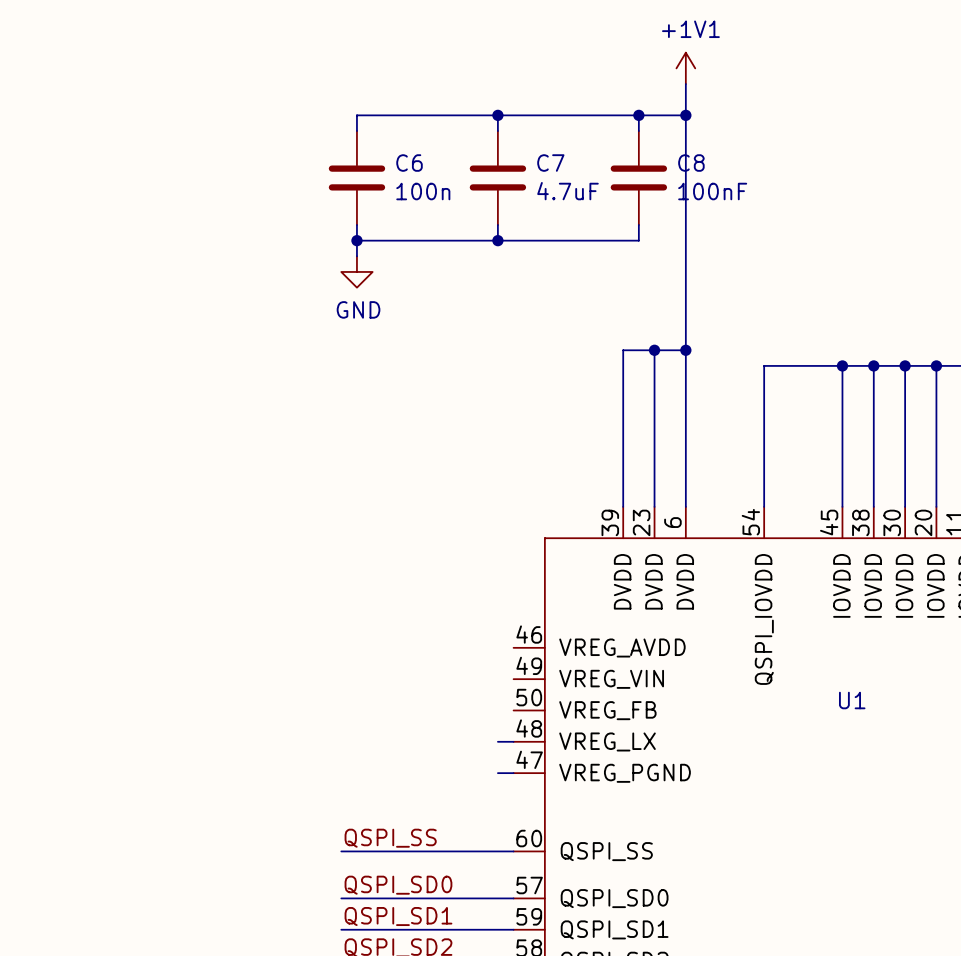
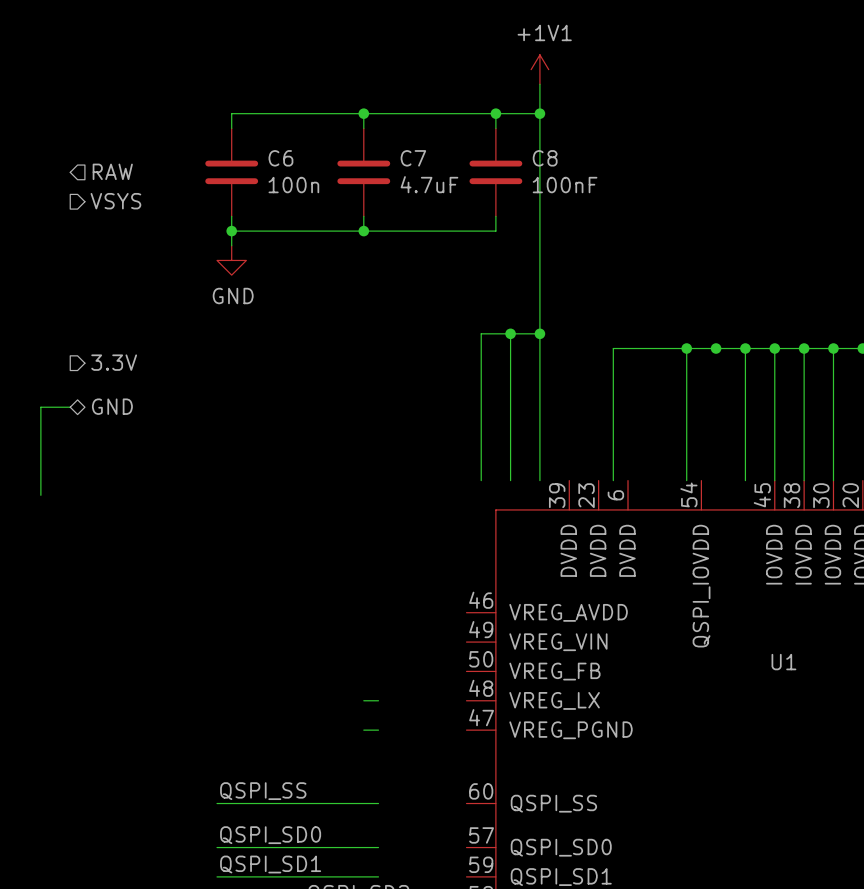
power symbol position: +1V1 (685, 68) -> +1V1 (539, 69)
wire: (685, 84) (685, 506) -> (539, 84) (539, 480)
wire: (356, 115) (356, 131) -> (319, 113) (231, 113) (231, 128)
junction: none -> (363, 113)
wire: (497, 115) (497, 131) -> (363, 113) (363, 128)
junction: (497, 115) -> none
junction: none -> (495, 113)
wire: (591, 115) (685, 115) -> none
junction: none -> (539, 113)
wire: (638, 115) (638, 131) -> (495, 113) (495, 128)
junction: (638, 115) -> none
junction: (685, 115) -> none
hierarchical label: none -> RAW (112, 171)
C6 position: (356, 178) -> (231, 172)
C7 position: (497, 178) -> (363, 172)
C8 position: (638, 178) -> (495, 172)
hierarchical label: none -> VSYS (115, 201)
wire: (356, 224) (356, 256) -> (231, 216) (231, 245)
wire: (497, 224) (497, 240) -> (363, 216) (363, 231)
wire: (638, 224) (638, 240) (544, 240) -> (495, 216) (495, 231)
wire: none -> (231, 231) (319, 231)
junction: none -> (231, 231)
junction: (356, 240) -> none
junction: none -> (363, 231)
junction: (497, 240) -> none
power symbol position: GND (356, 271) -> GND (231, 260)
junction: none -> (510, 333)
junction: none -> (539, 333)
wire: (654, 350) (654, 506) -> (510, 333) (510, 480)
junction: (654, 350) -> none
wire: (685, 350) (623, 350) (623, 506) -> (539, 333) (481, 333) (481, 480)
junction: (685, 350) -> none
junction: none -> (686, 348)
wire: (764, 365) (764, 506) -> (701, 348) (613, 348) (613, 480)
junction: none -> (716, 348)
wire: none -> (745, 348) (745, 480)
junction: none -> (745, 348)
wire: (936, 365) (936, 506) -> (686, 348) (686, 480)
hierarchical label: none -> 3.3V (114, 362)
wire: none -> (70, 407) (40, 407) (40, 495)
hierarchical label: none -> GND (112, 406)
wire: (497, 741) (513, 741) -> (363, 700) (378, 700)
wire: (497, 773) (513, 773) -> (363, 730) (378, 730)
label position: QSPI_SS (390, 838) -> QSPI_SS (263, 791)
wire: (419, 851) (513, 851) -> (217, 803) (305, 803)
label position: QSPI_SD0 (398, 885) -> QSPI_SD0 (270, 835)
wire: (419, 898) (513, 898) -> (217, 847) (305, 847)
label position: QSPI_SD1 (398, 916) -> QSPI_SD1 (270, 864)
wire: (419, 929) (513, 929) -> (217, 876) (305, 876)

